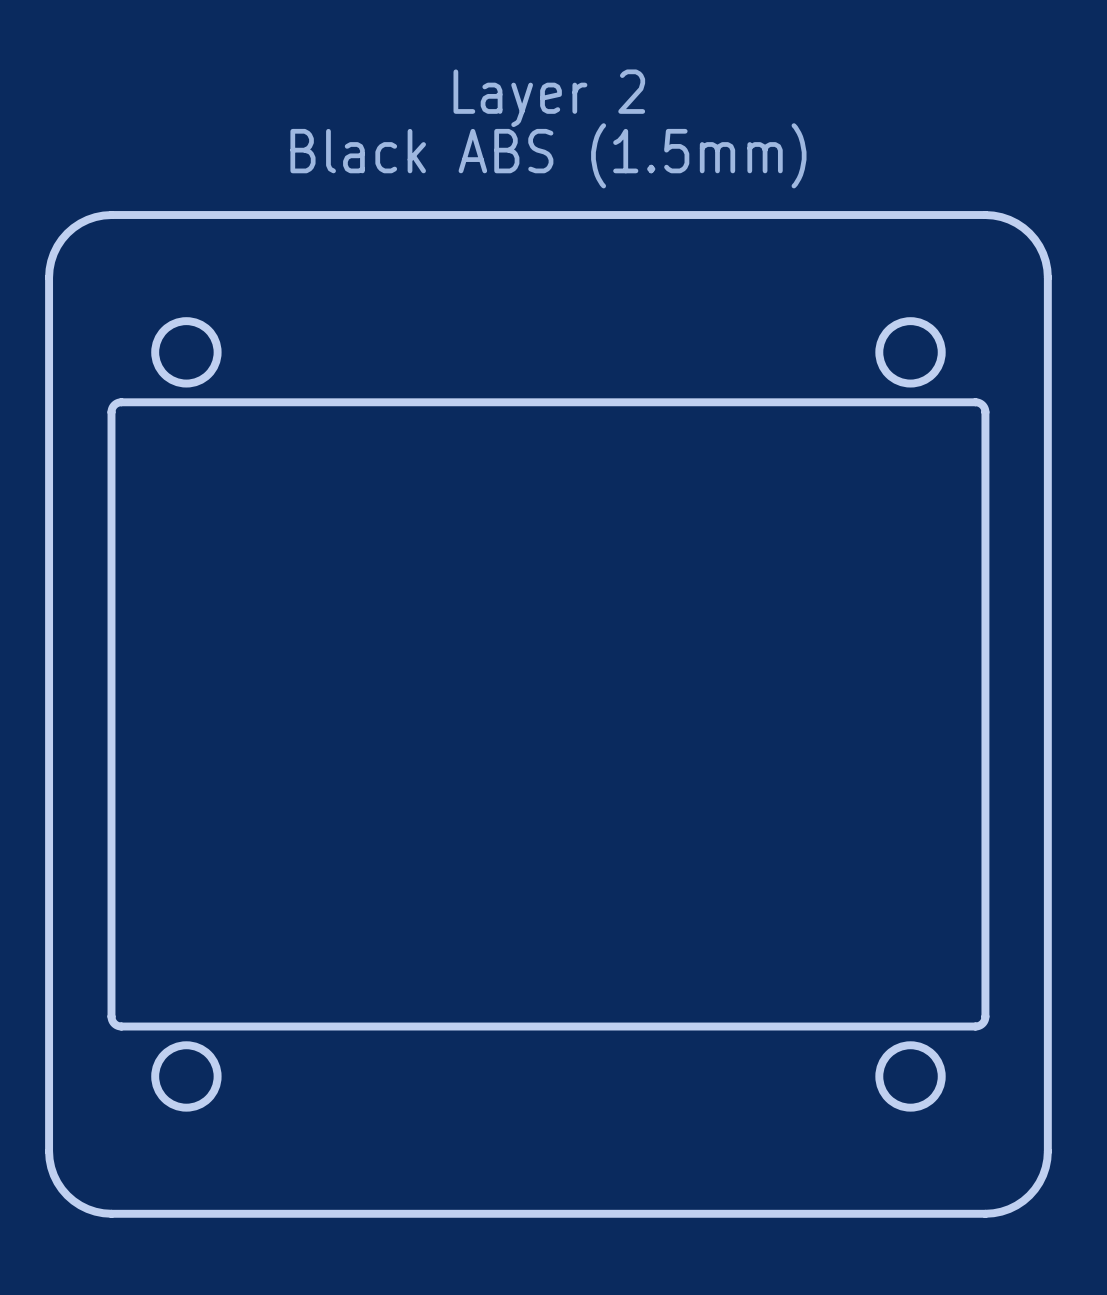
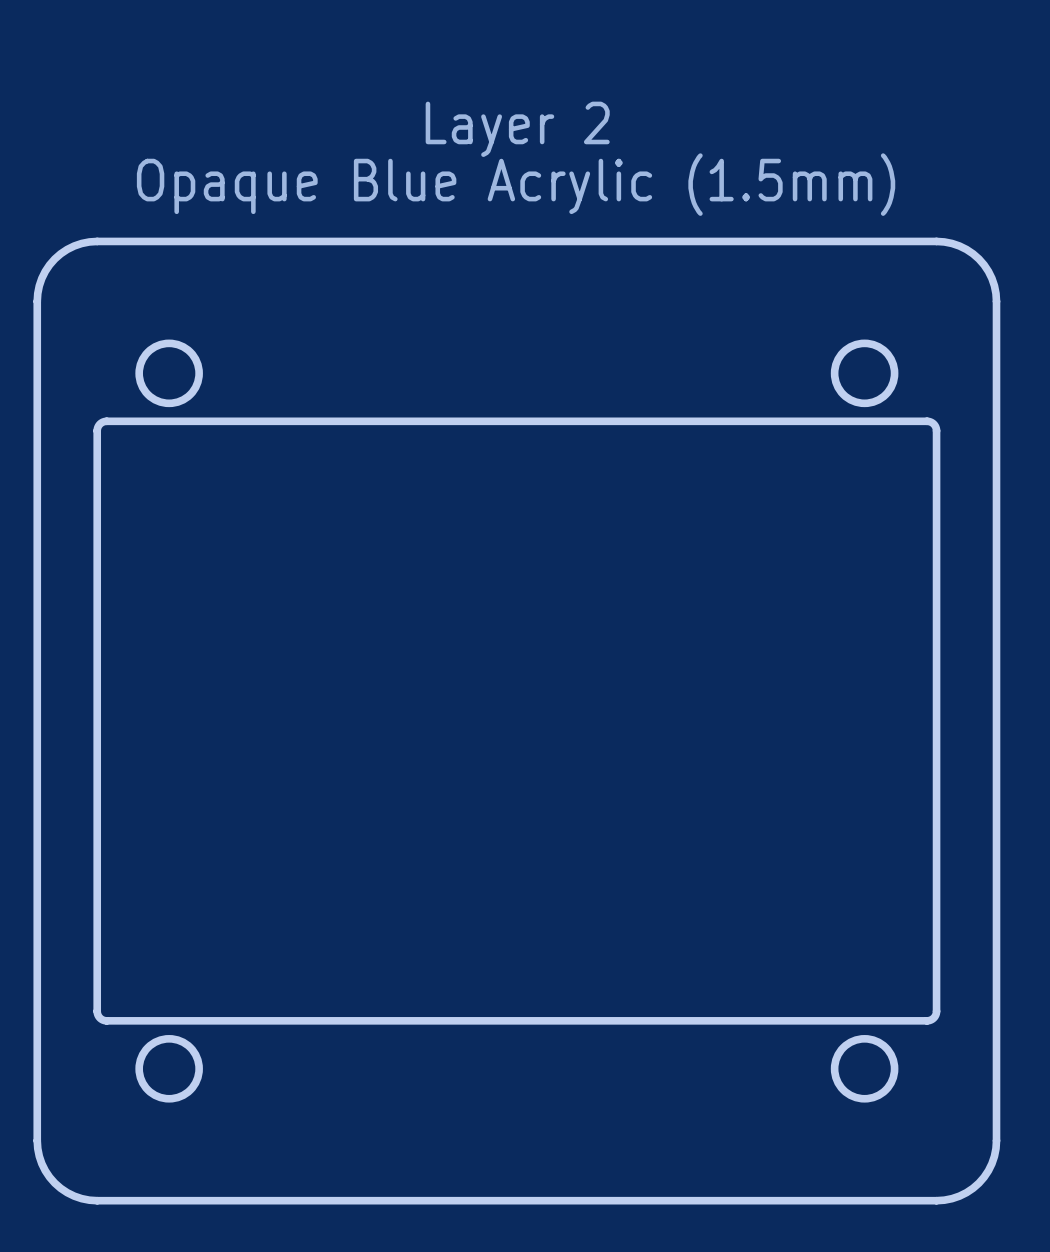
text: Black ABS (1.5mm) (548, 155) -> Opaque Blue Acrylic (1.5mm) (516, 184)

